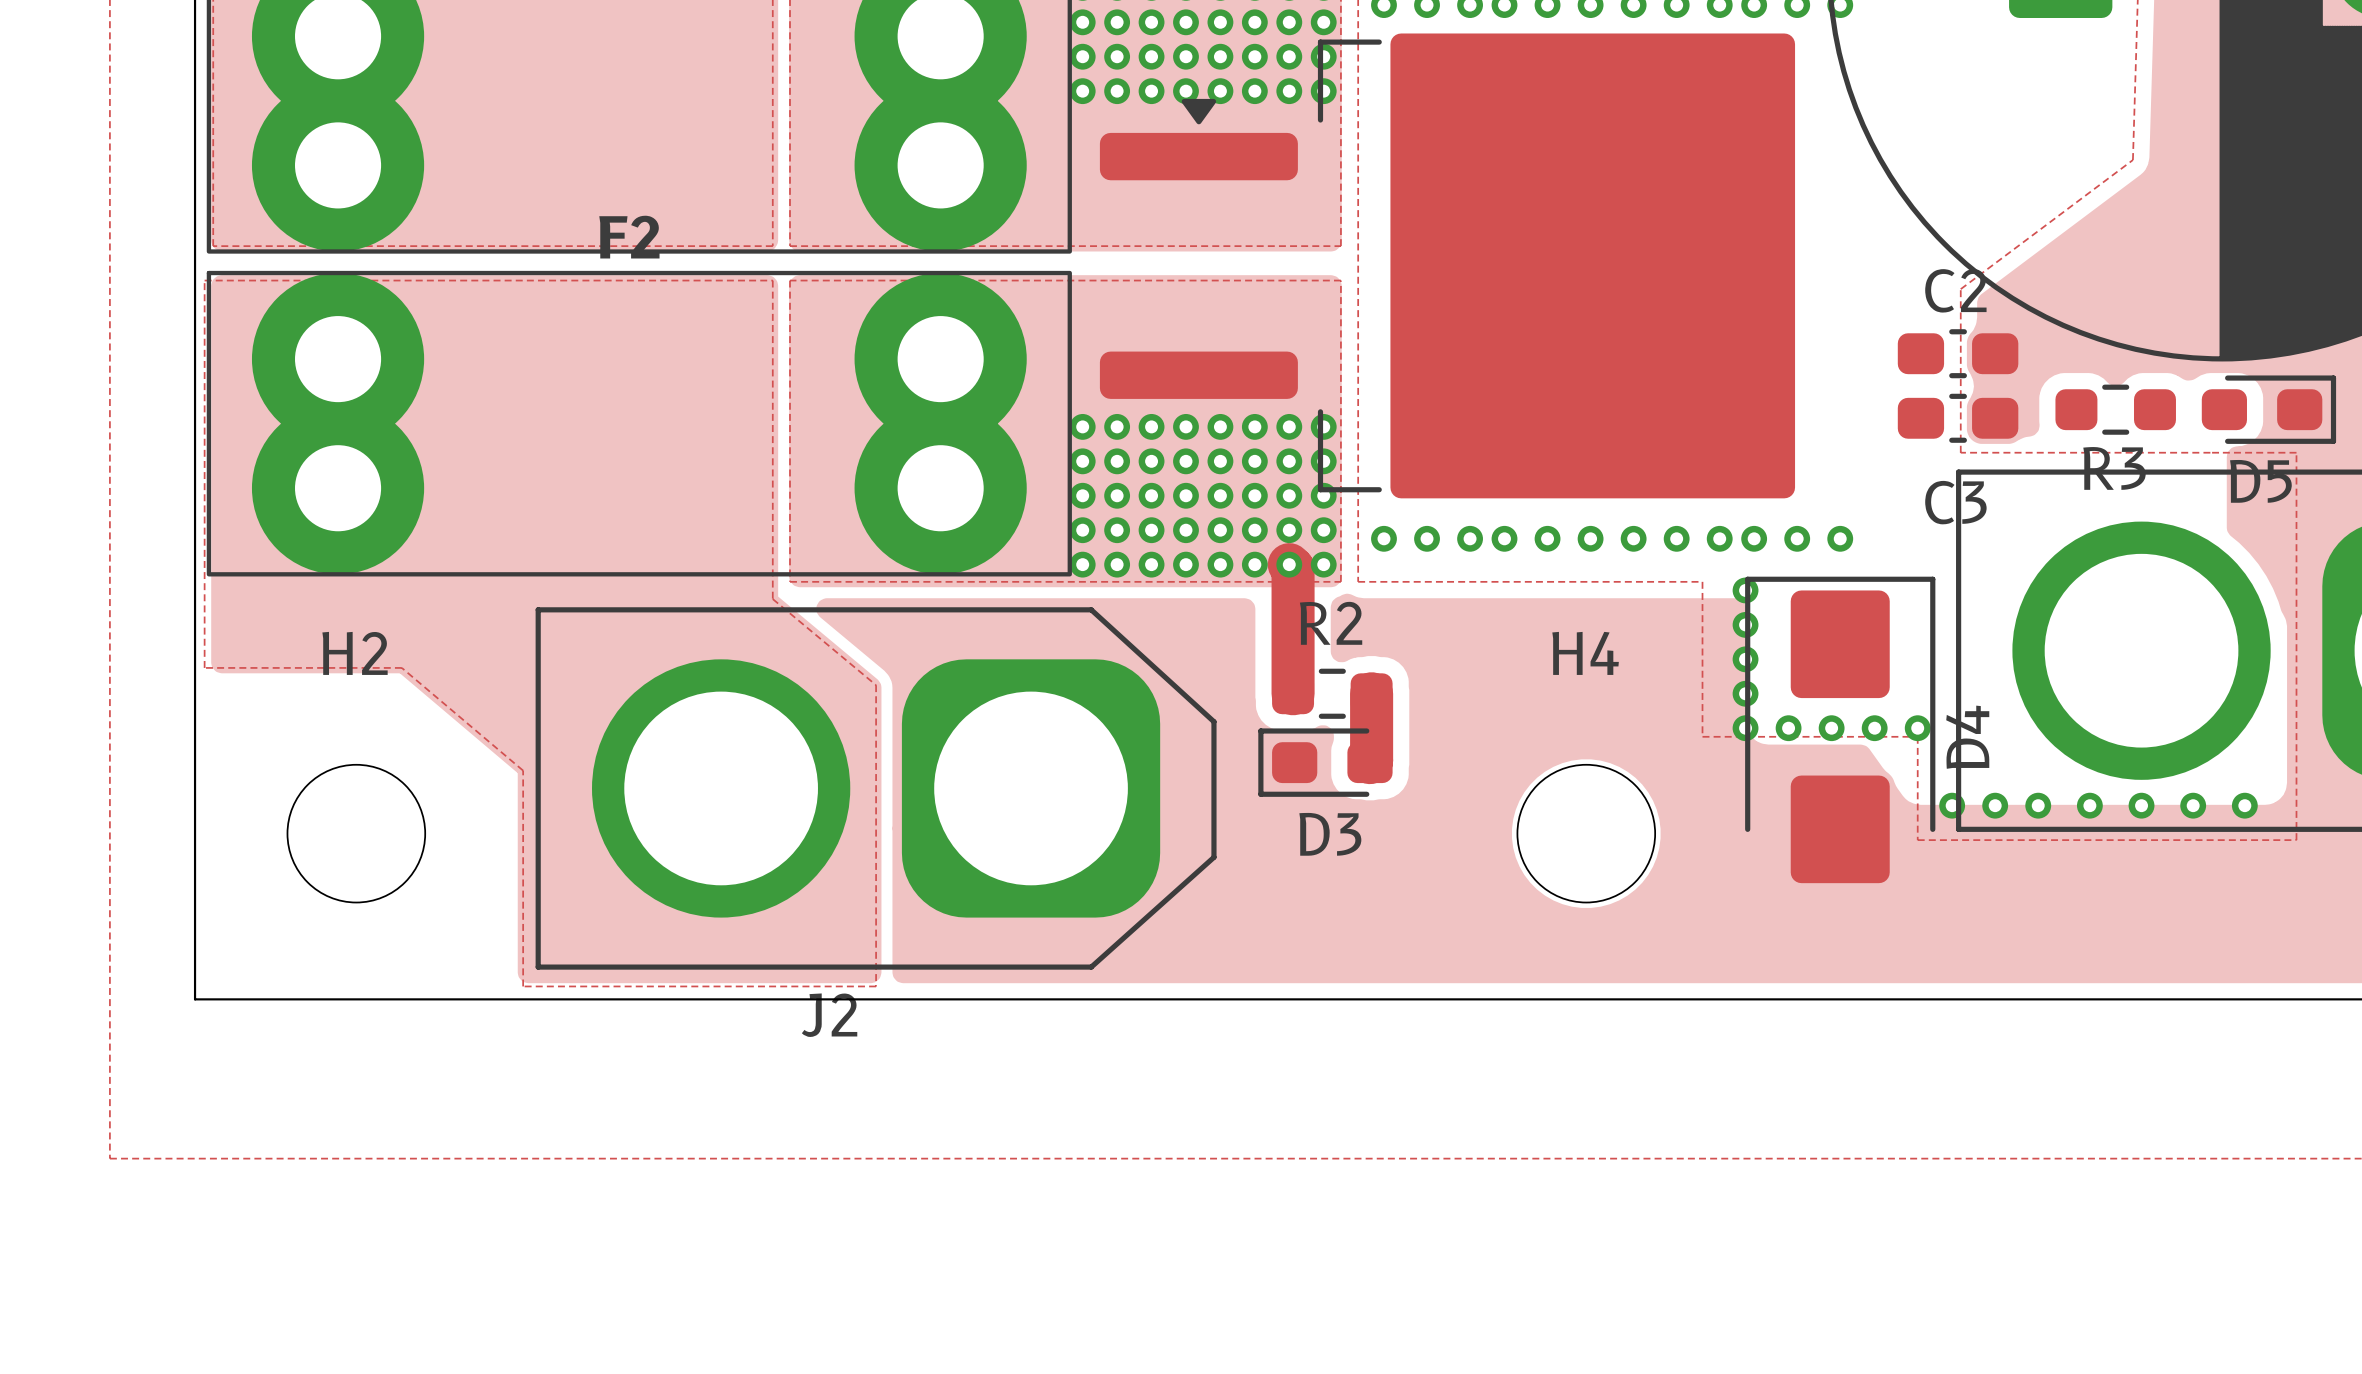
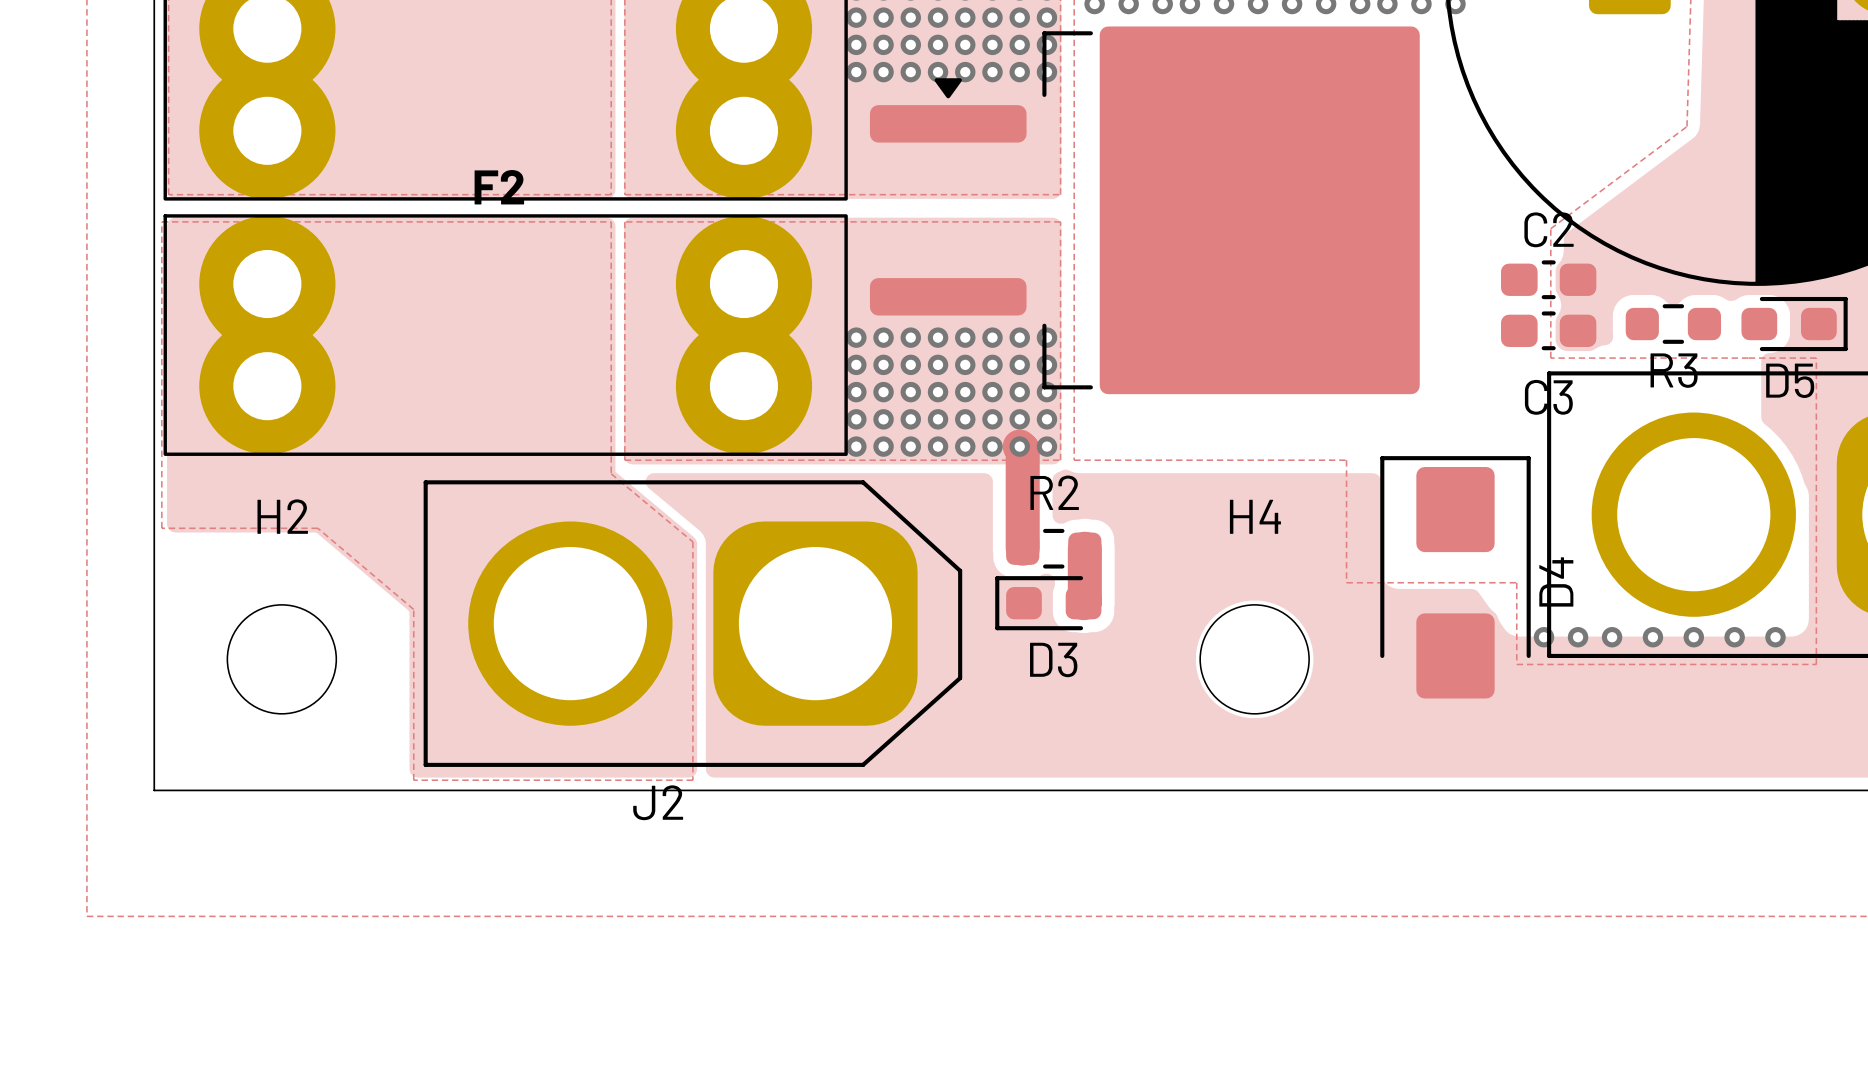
via: (1383, 538) -> none
via: (1427, 538) -> none
via: (1470, 538) -> none
via: (1504, 538) -> none
via: (1547, 538) -> none
via: (1590, 538) -> none
via: (1633, 538) -> none
via: (1676, 538) -> none
via: (1719, 538) -> none
via: (1754, 538) -> none
via: (1797, 538) -> none
via: (1840, 538) -> none
via: (1745, 590) -> none
via: (1745, 624) -> none
via: (1745, 659) -> none
via: (1745, 693) -> none
via: (1745, 728) -> none
via: (1788, 728) -> none
via: (1831, 728) -> none
via: (1874, 728) -> none
via: (1917, 728) -> none

